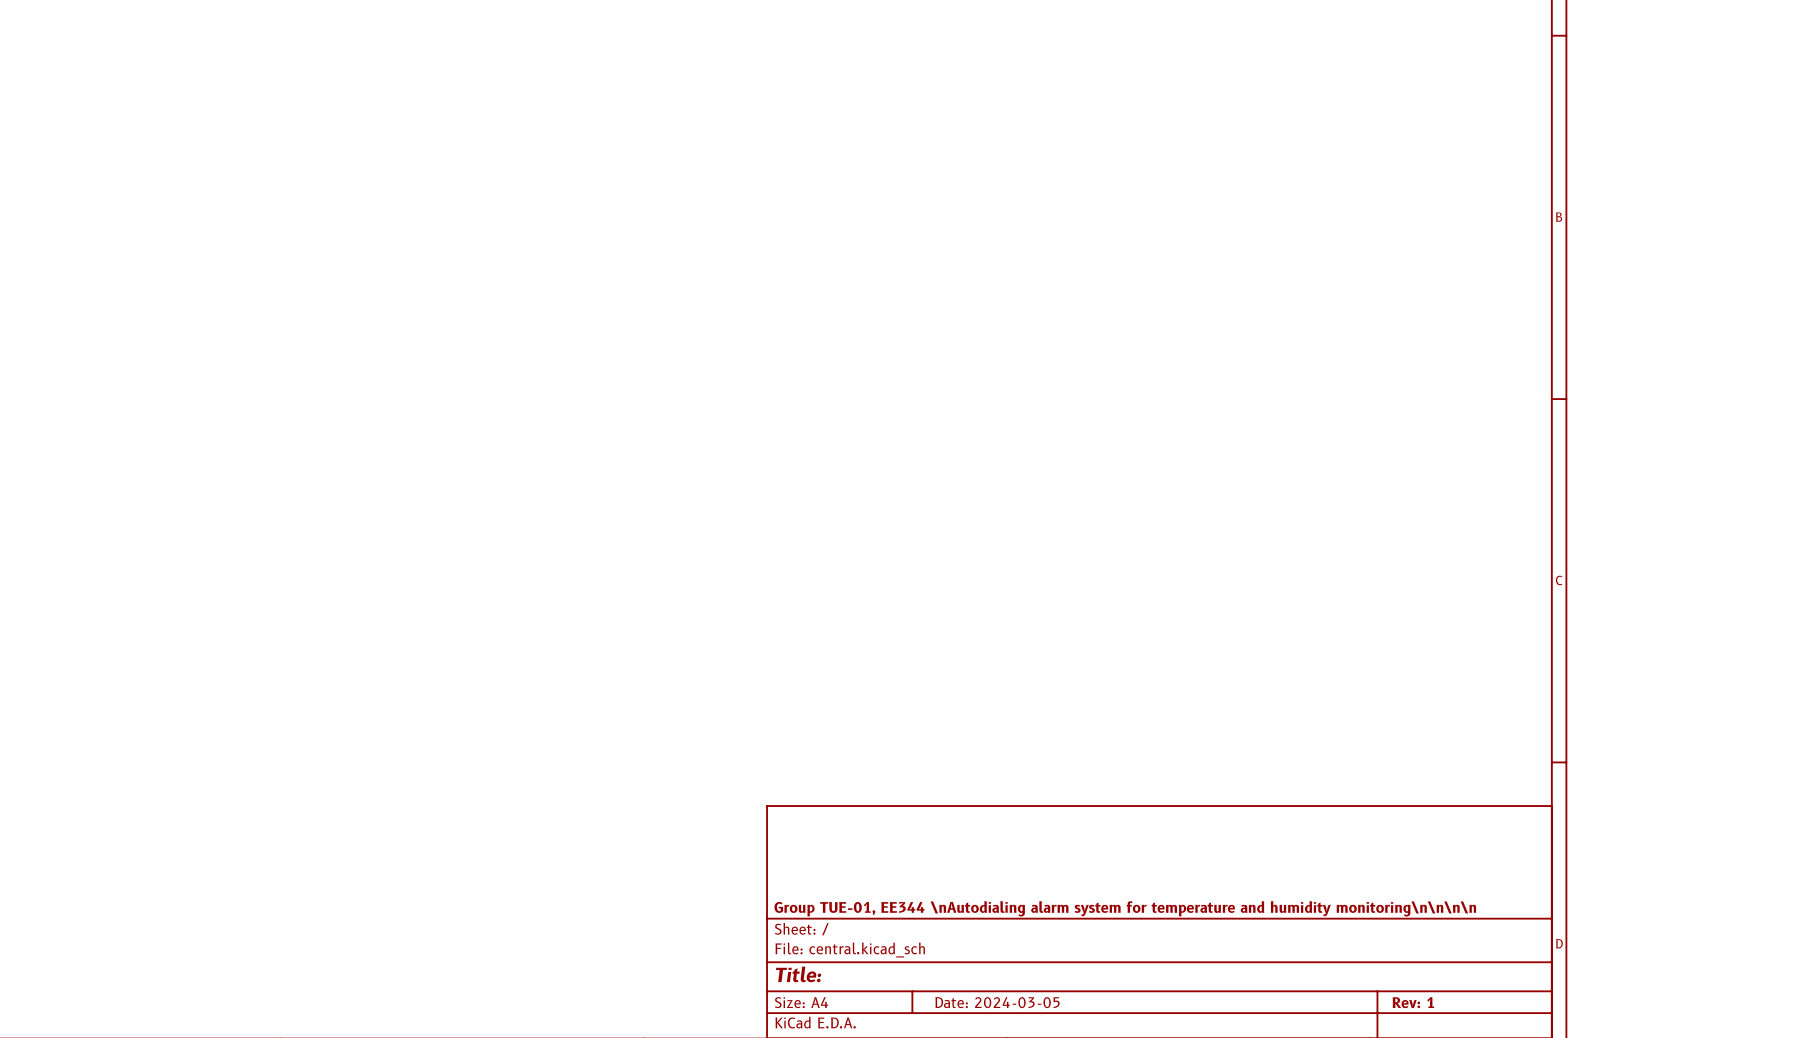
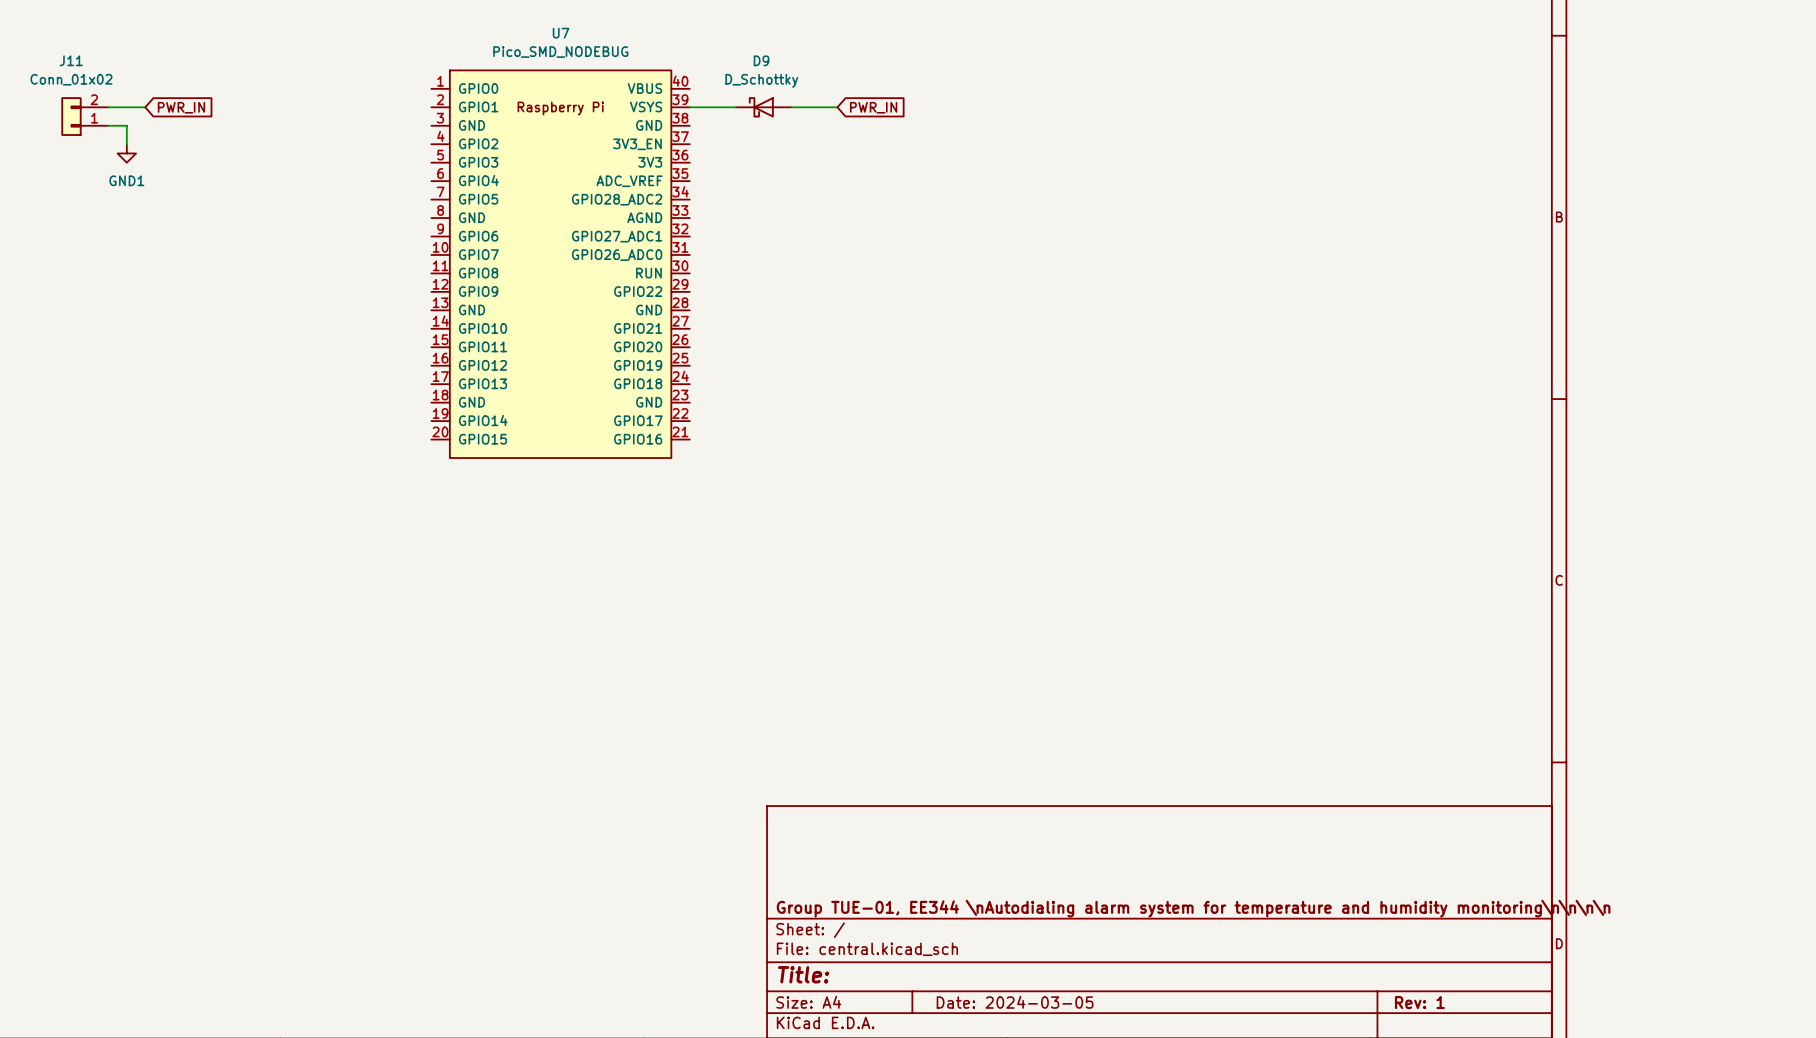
wire: none -> (108, 107) (145, 107)
wire: none -> (689, 107) (735, 107)
D9: none -> D_Schottky (763, 107)
wire: none -> (791, 107) (837, 107)
global label: none -> PWR_IN (181, 107)
global label: none -> PWR_IN (873, 107)
J11: none -> Conn_01x02 (84, 116)
wire: none -> (108, 125) (126, 125) (126, 144)
power symbol: none -> GND1 (126, 153)
U7: none -> Pico_SMD_NODEBUG (560, 264)

